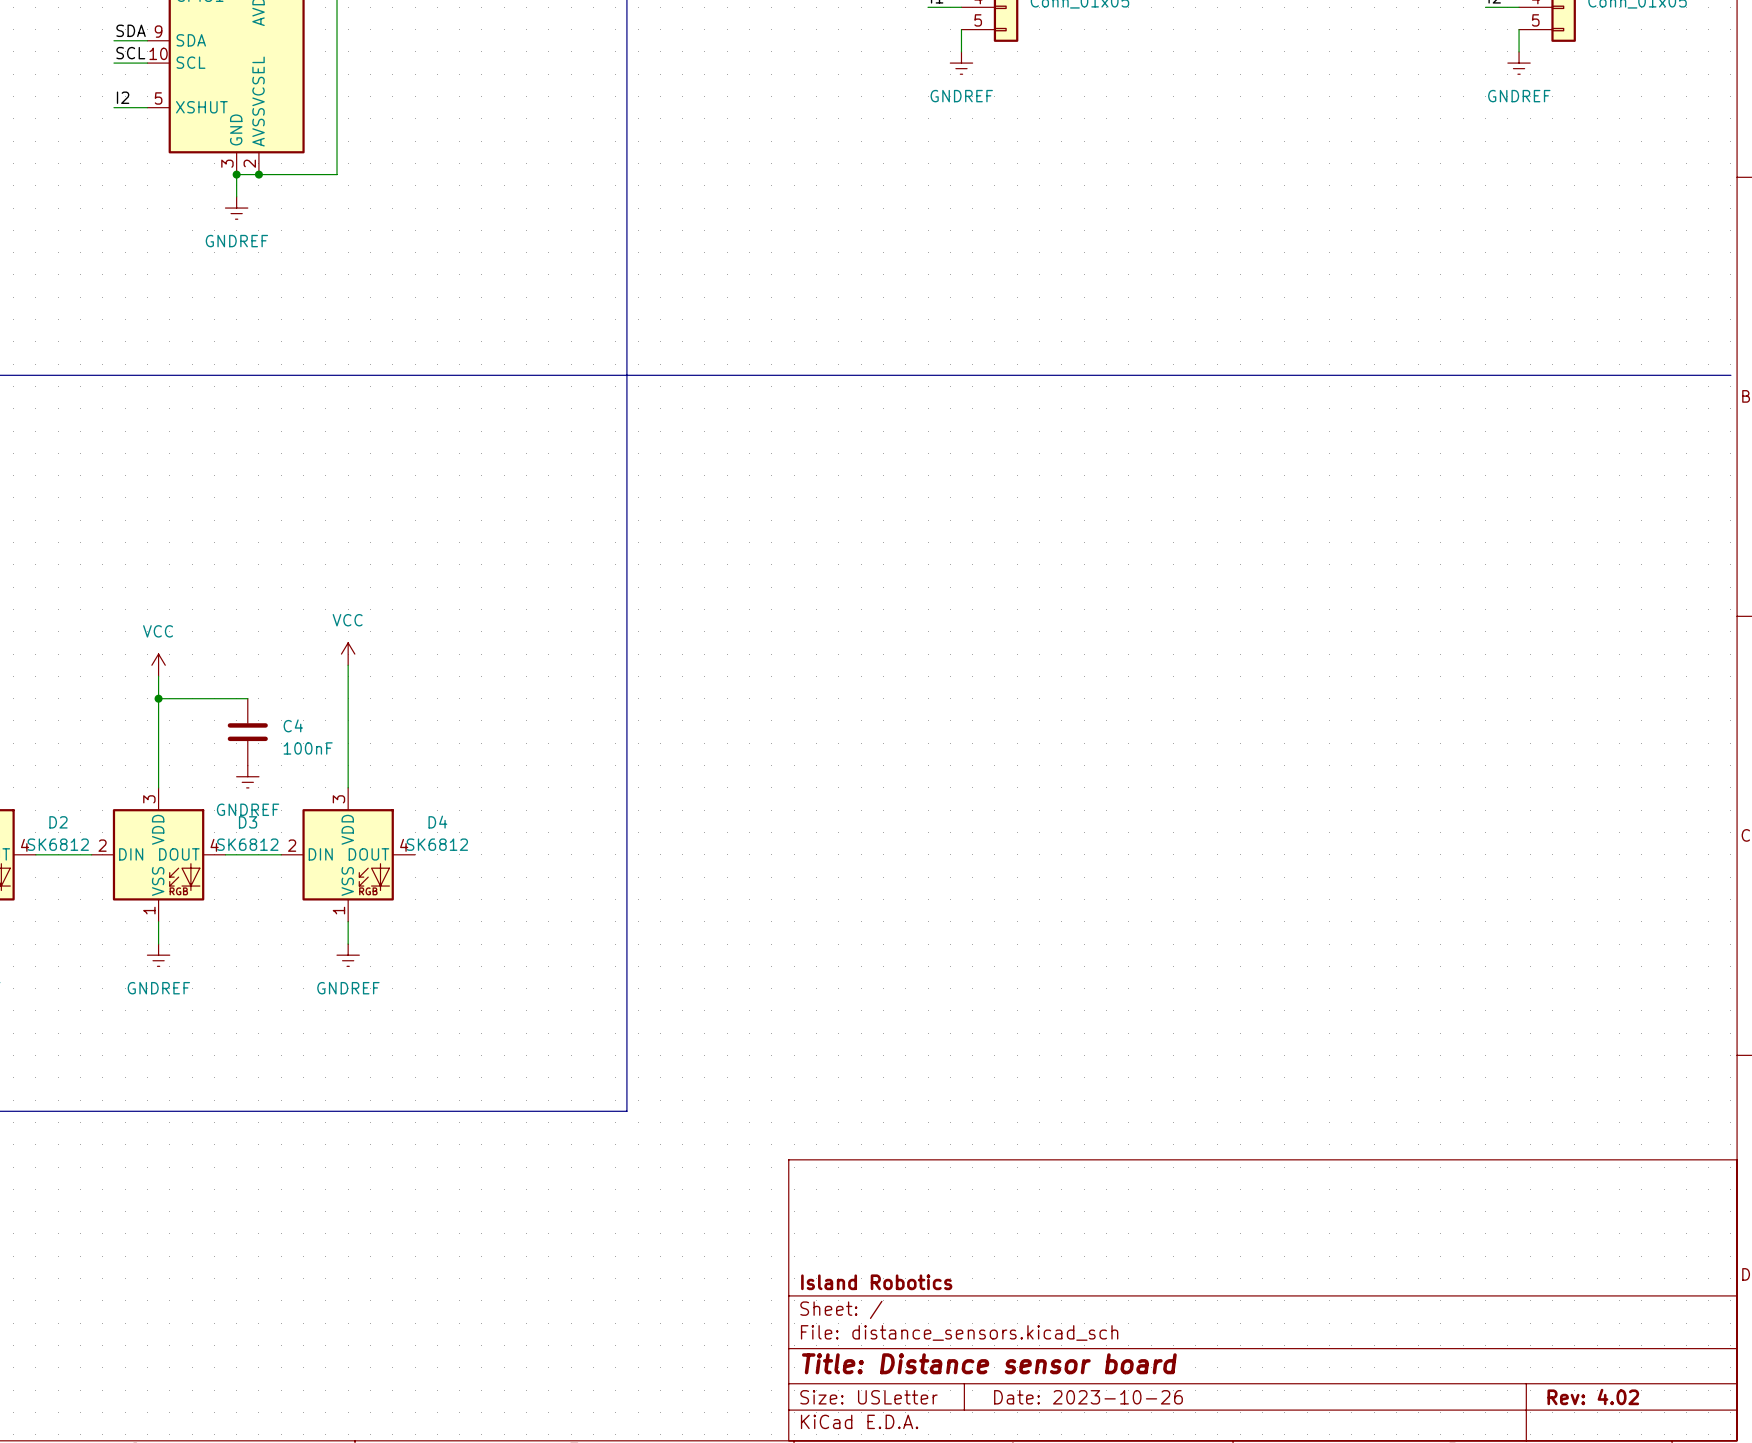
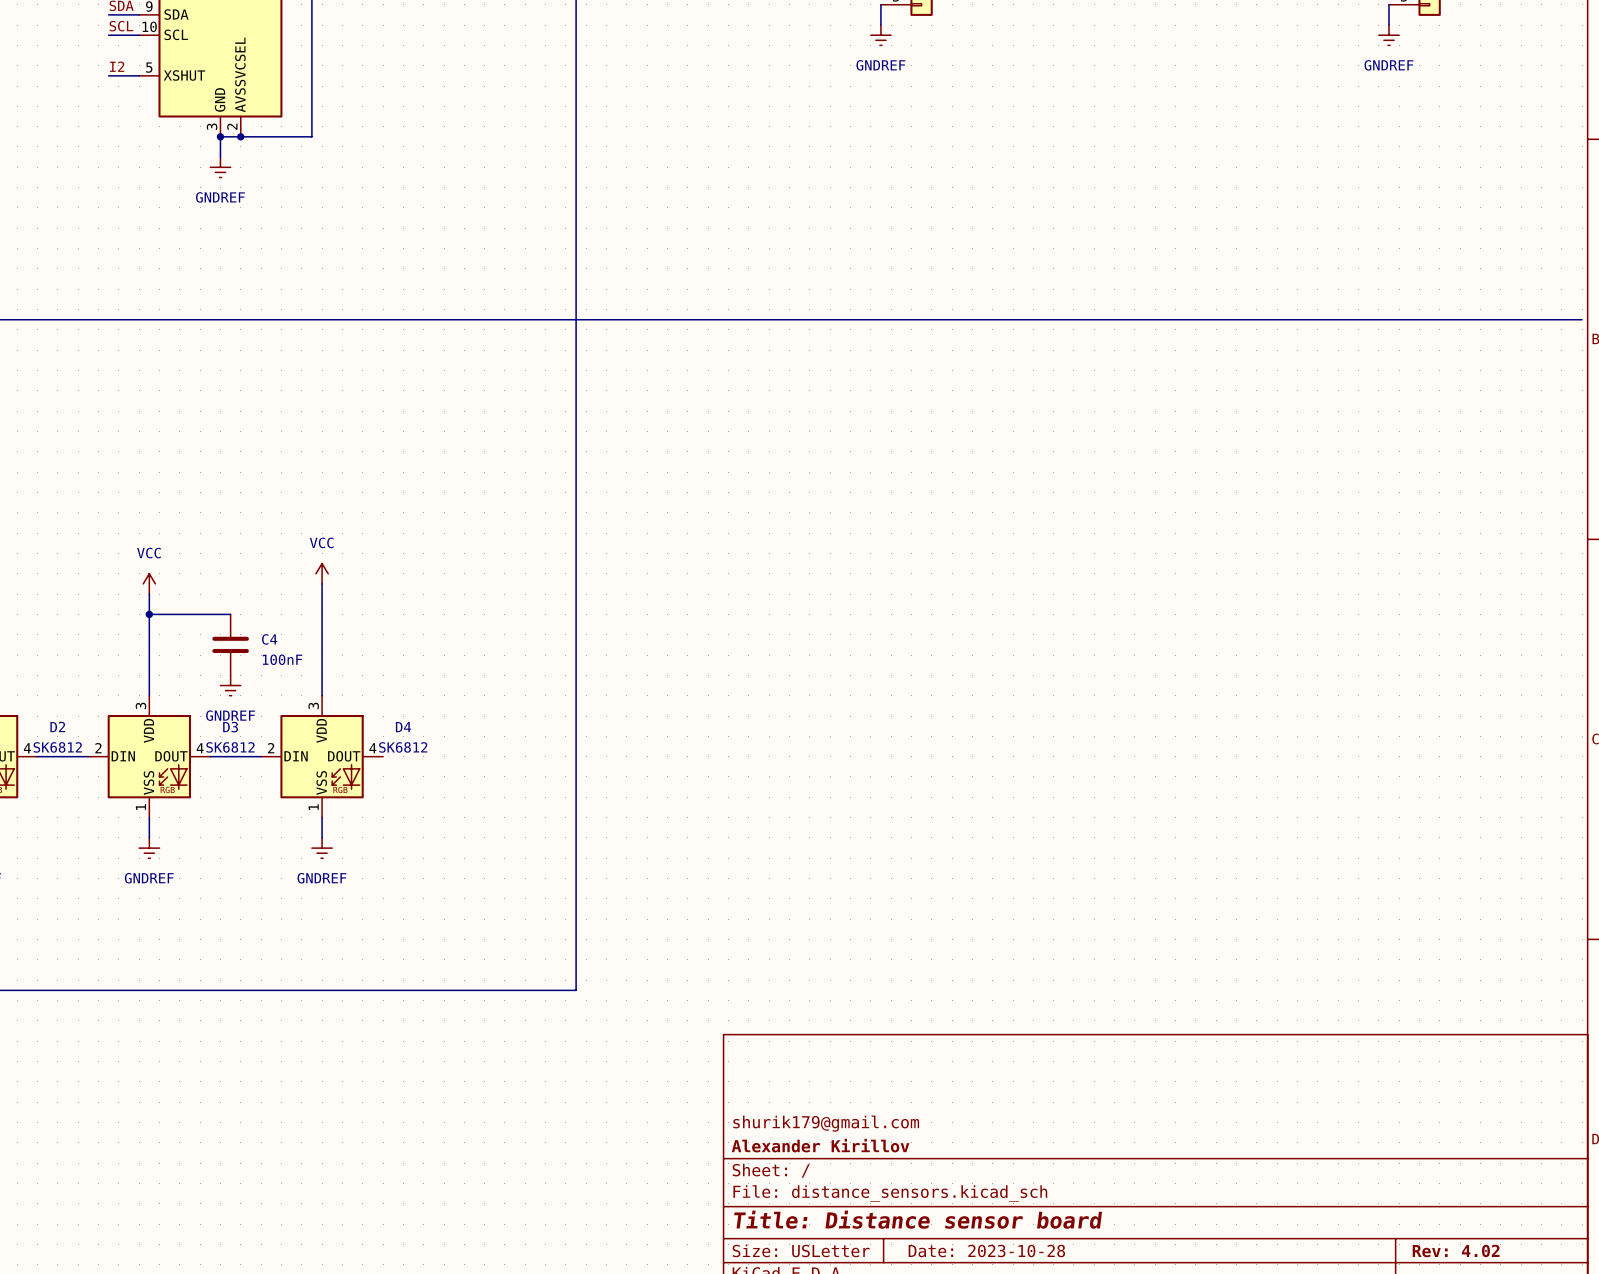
title block: none -> shurik179@gmail.com (826, 1123)
title block: Island Robotics (876, 1282) -> Alexander Kirillov (820, 1145)
title block: Date: 2023-10-26 (1088, 1397) -> Date: 2023-10-28 (986, 1251)

